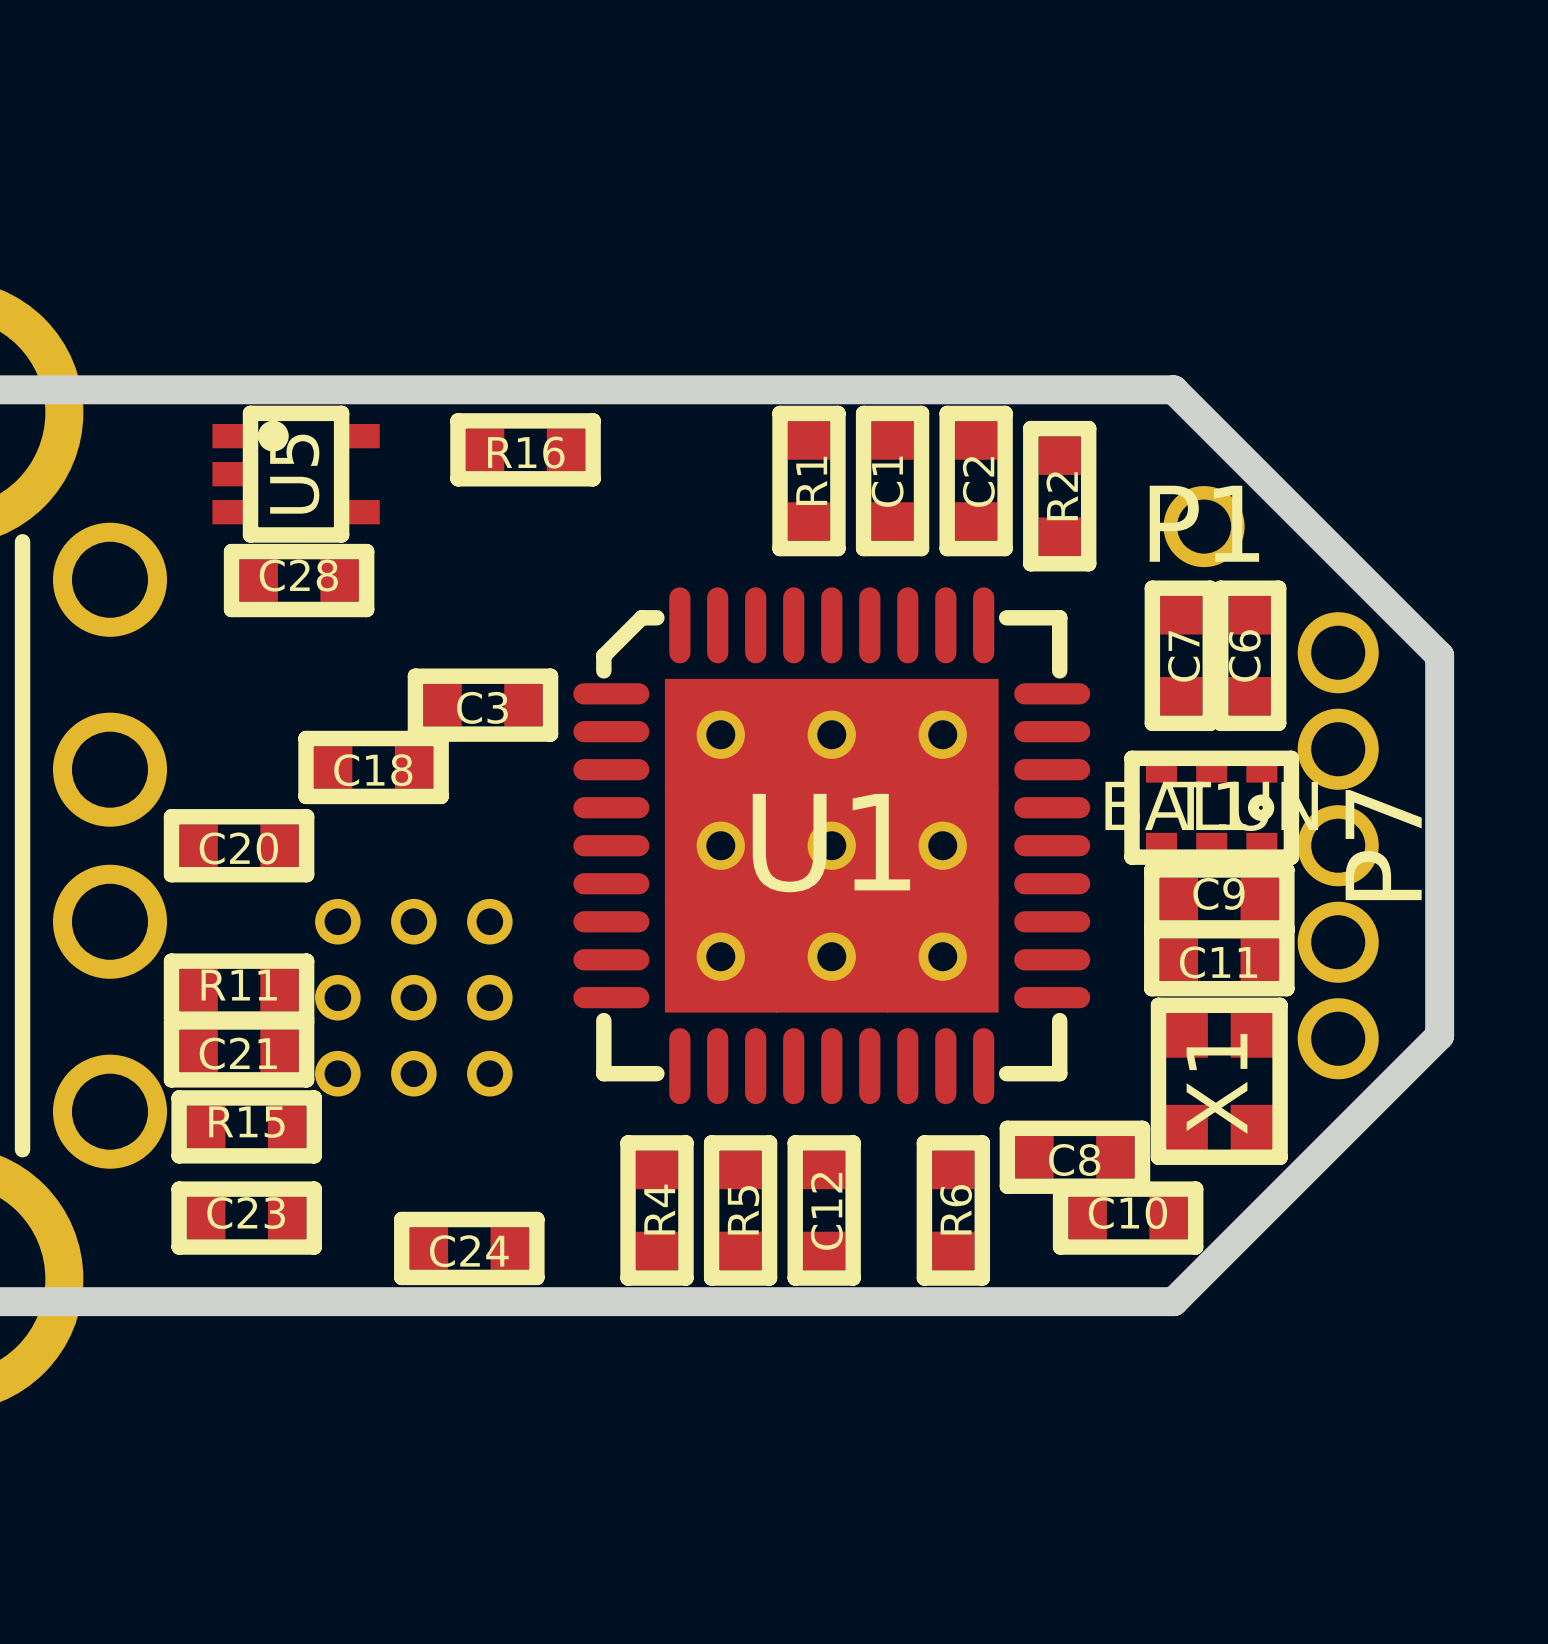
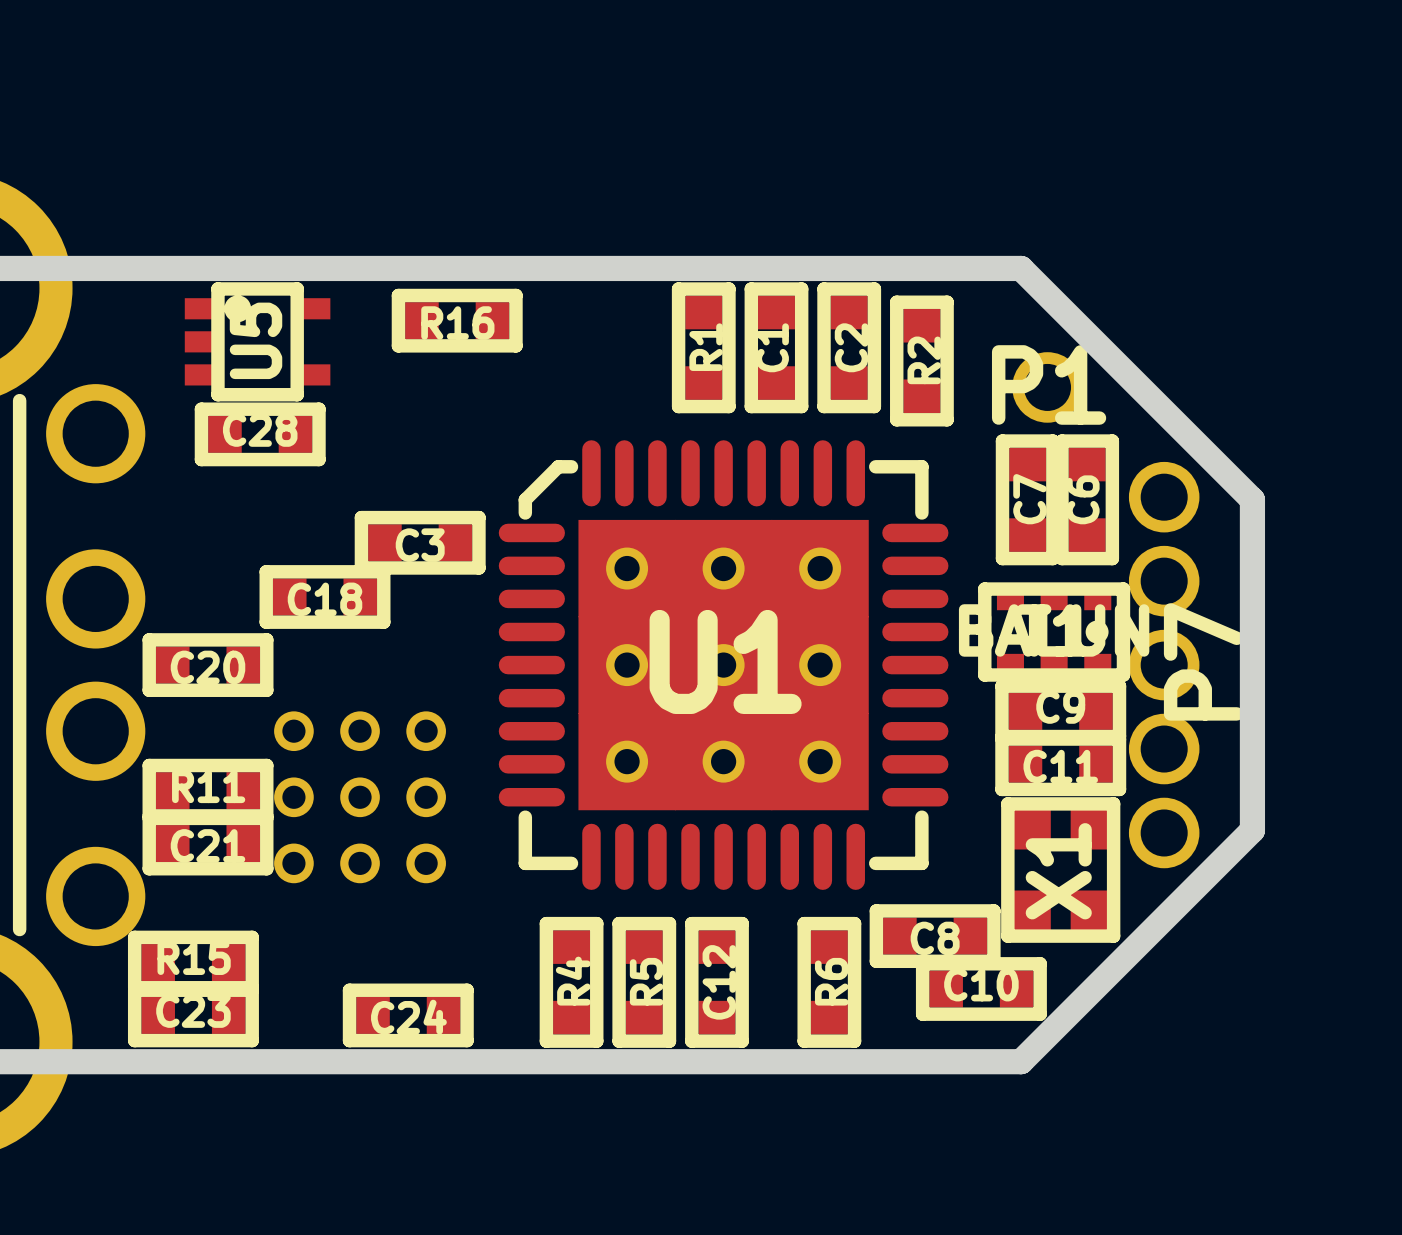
R15 position: (246, 1126) -> (193, 962)
C23 position: (246, 1218) -> (193, 1015)

